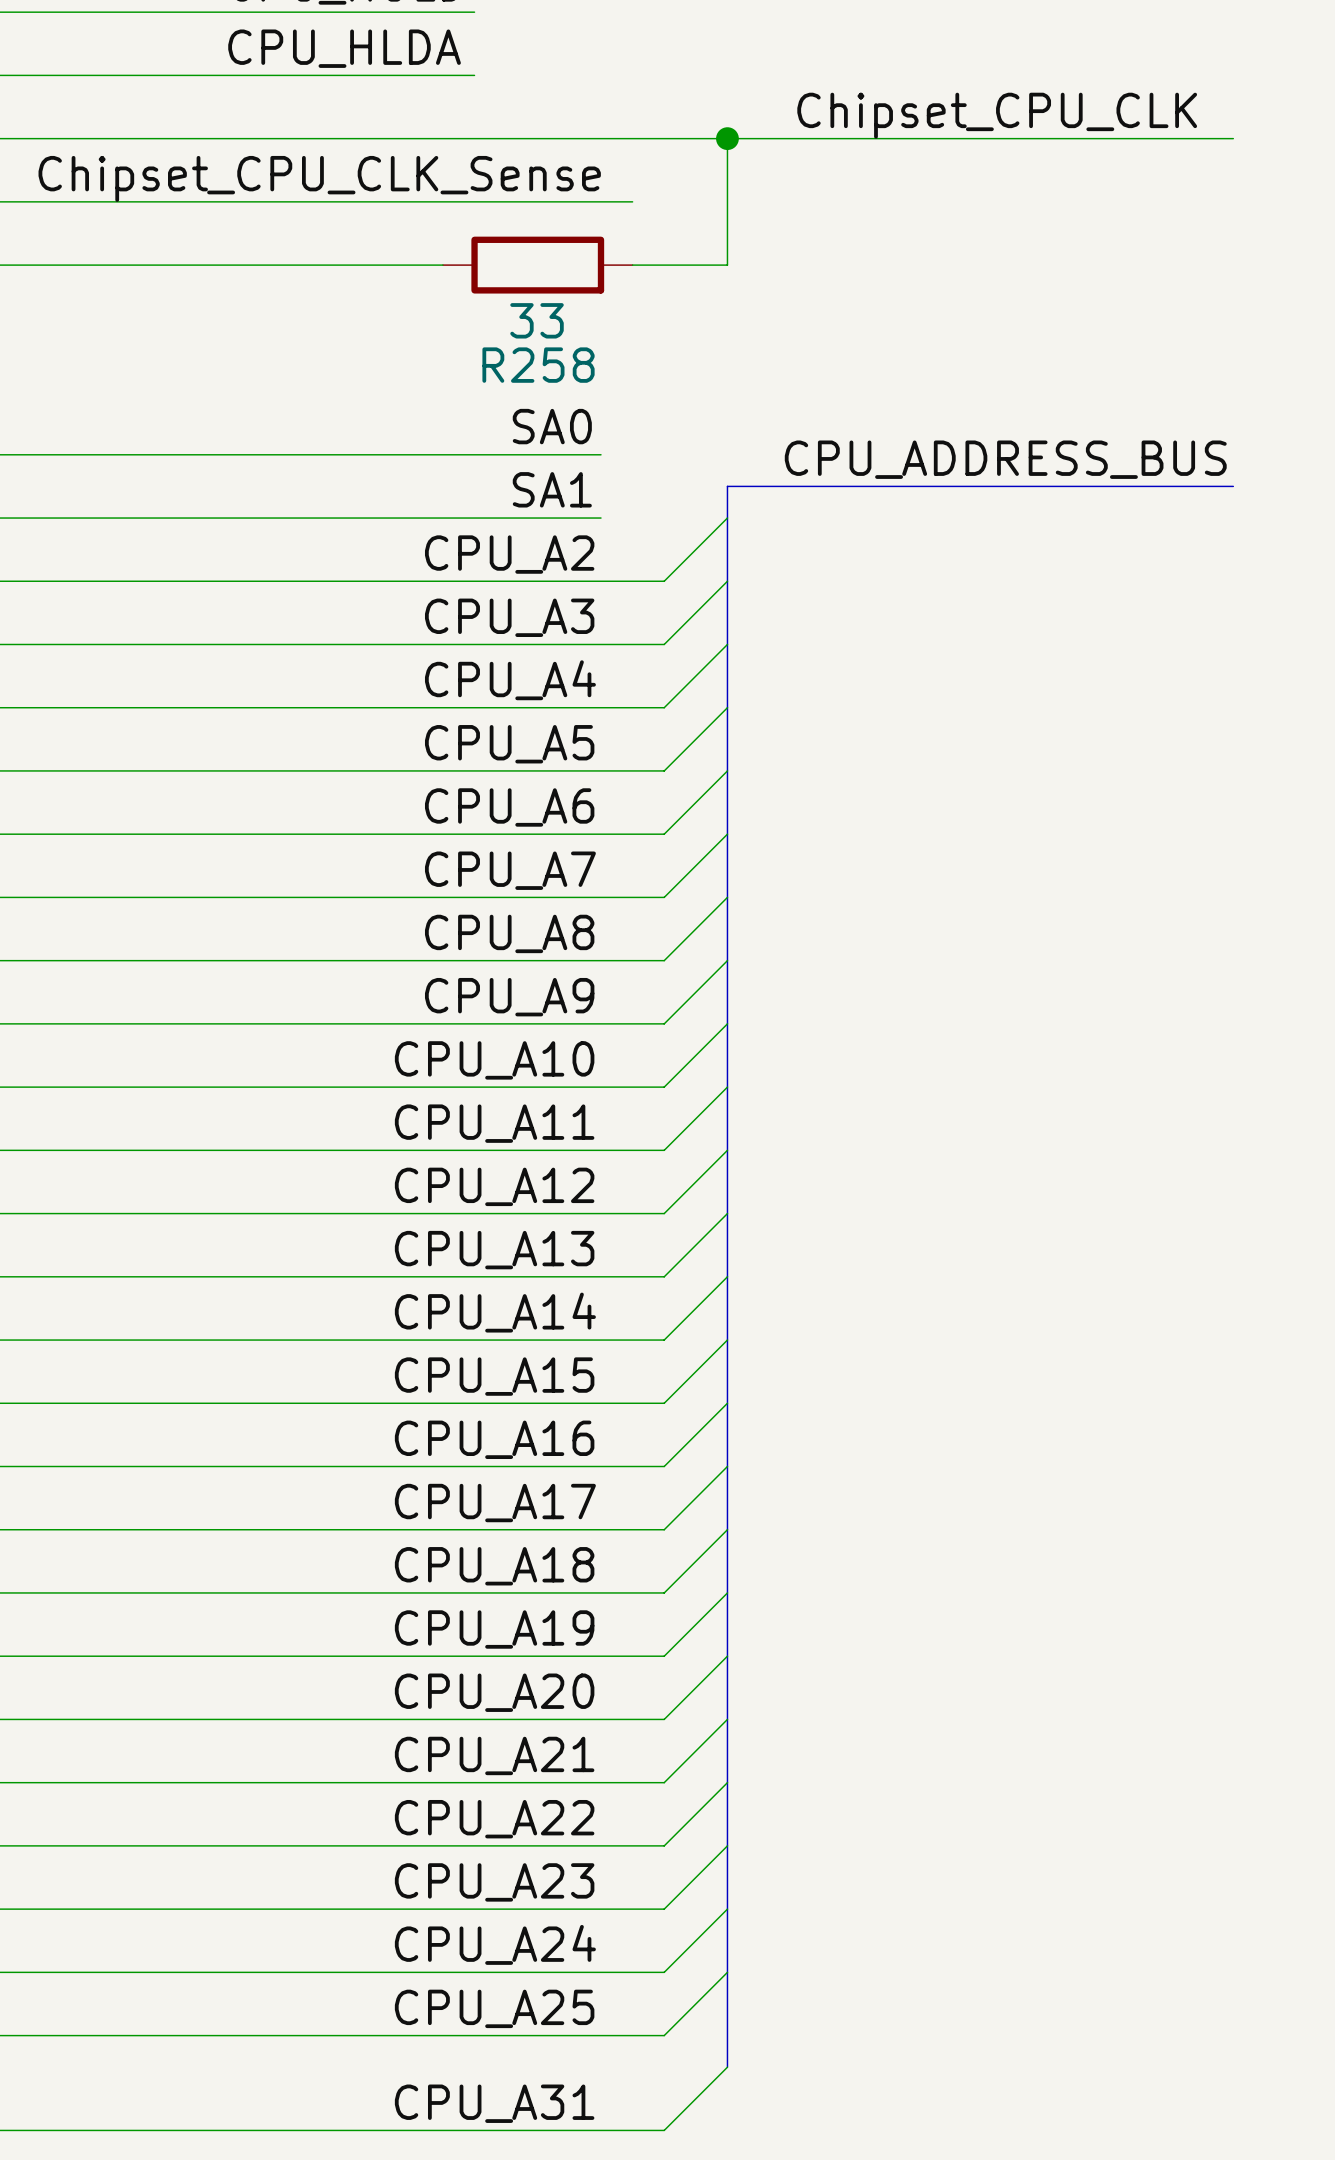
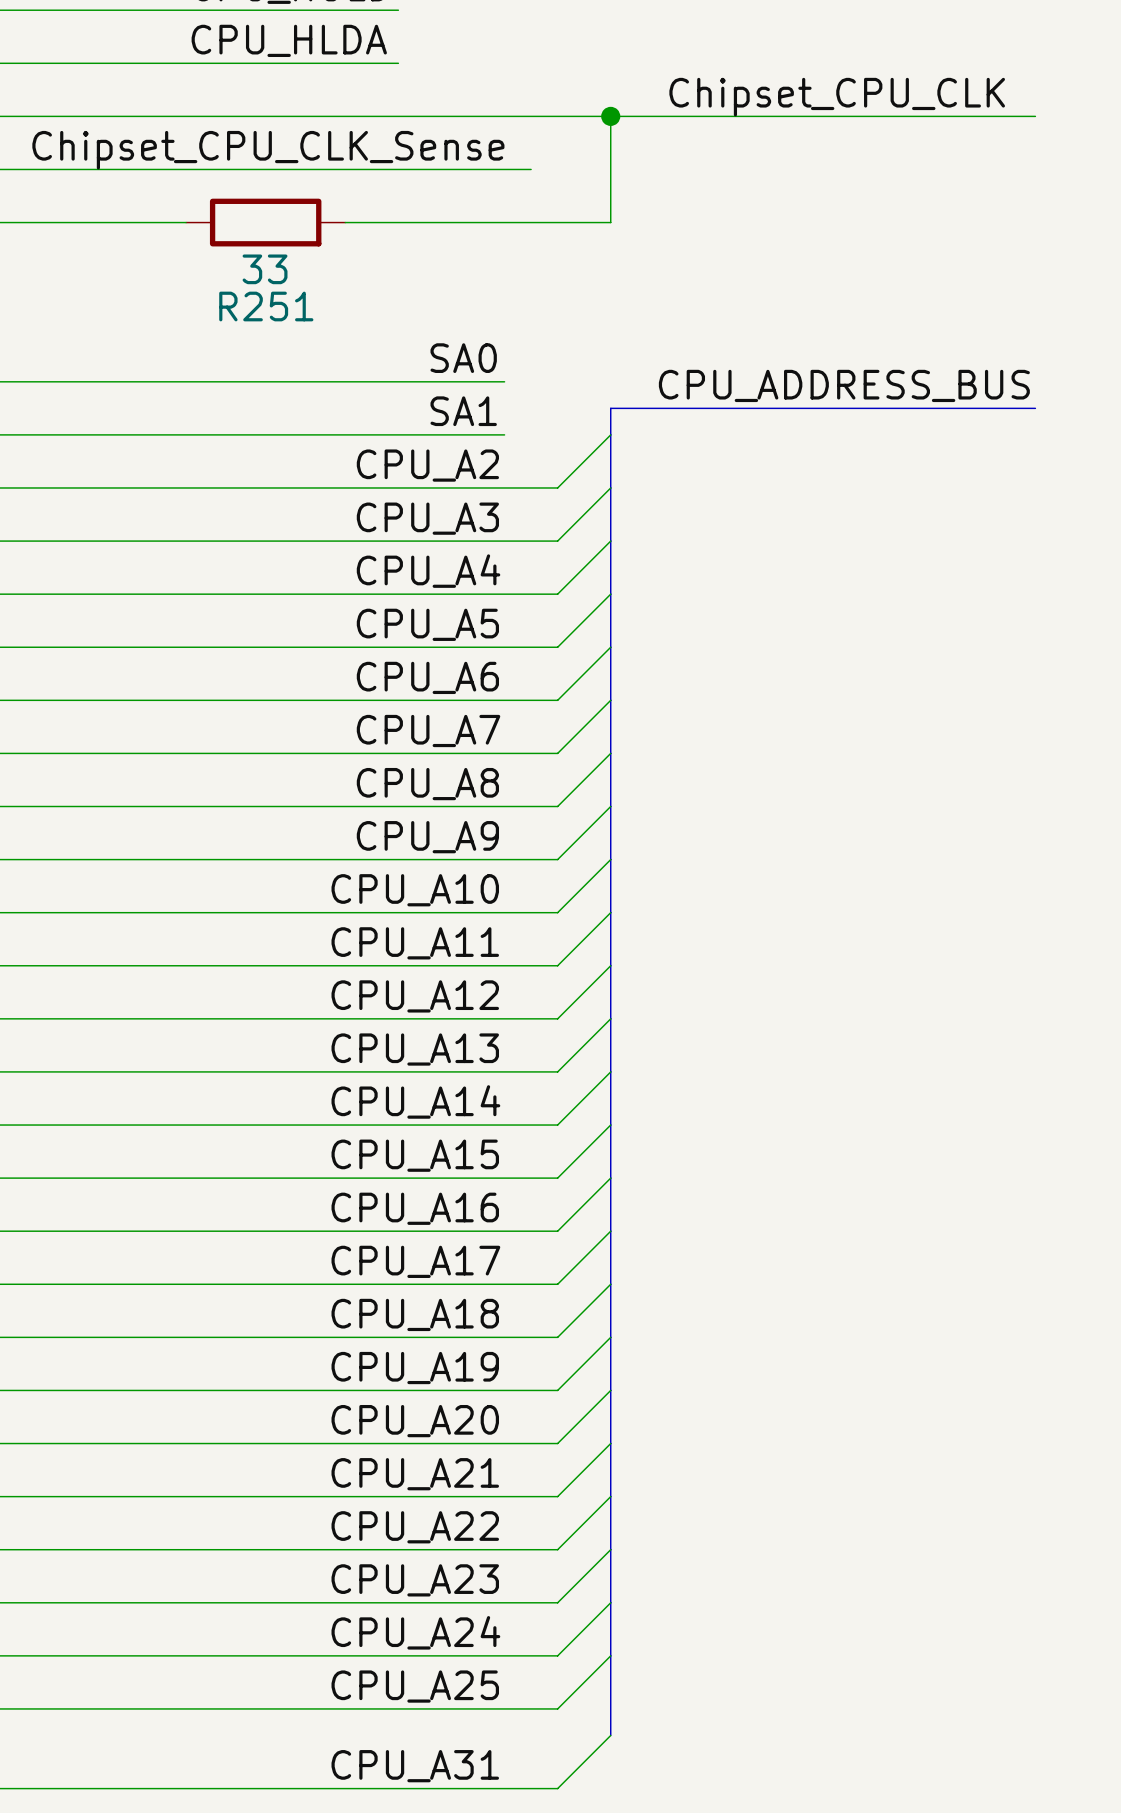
wire: (221, 265) (411, 265) -> (371, 222) (531, 222)
R251: none -> 33 (265, 222)
R258: 33 (537, 265) -> none

